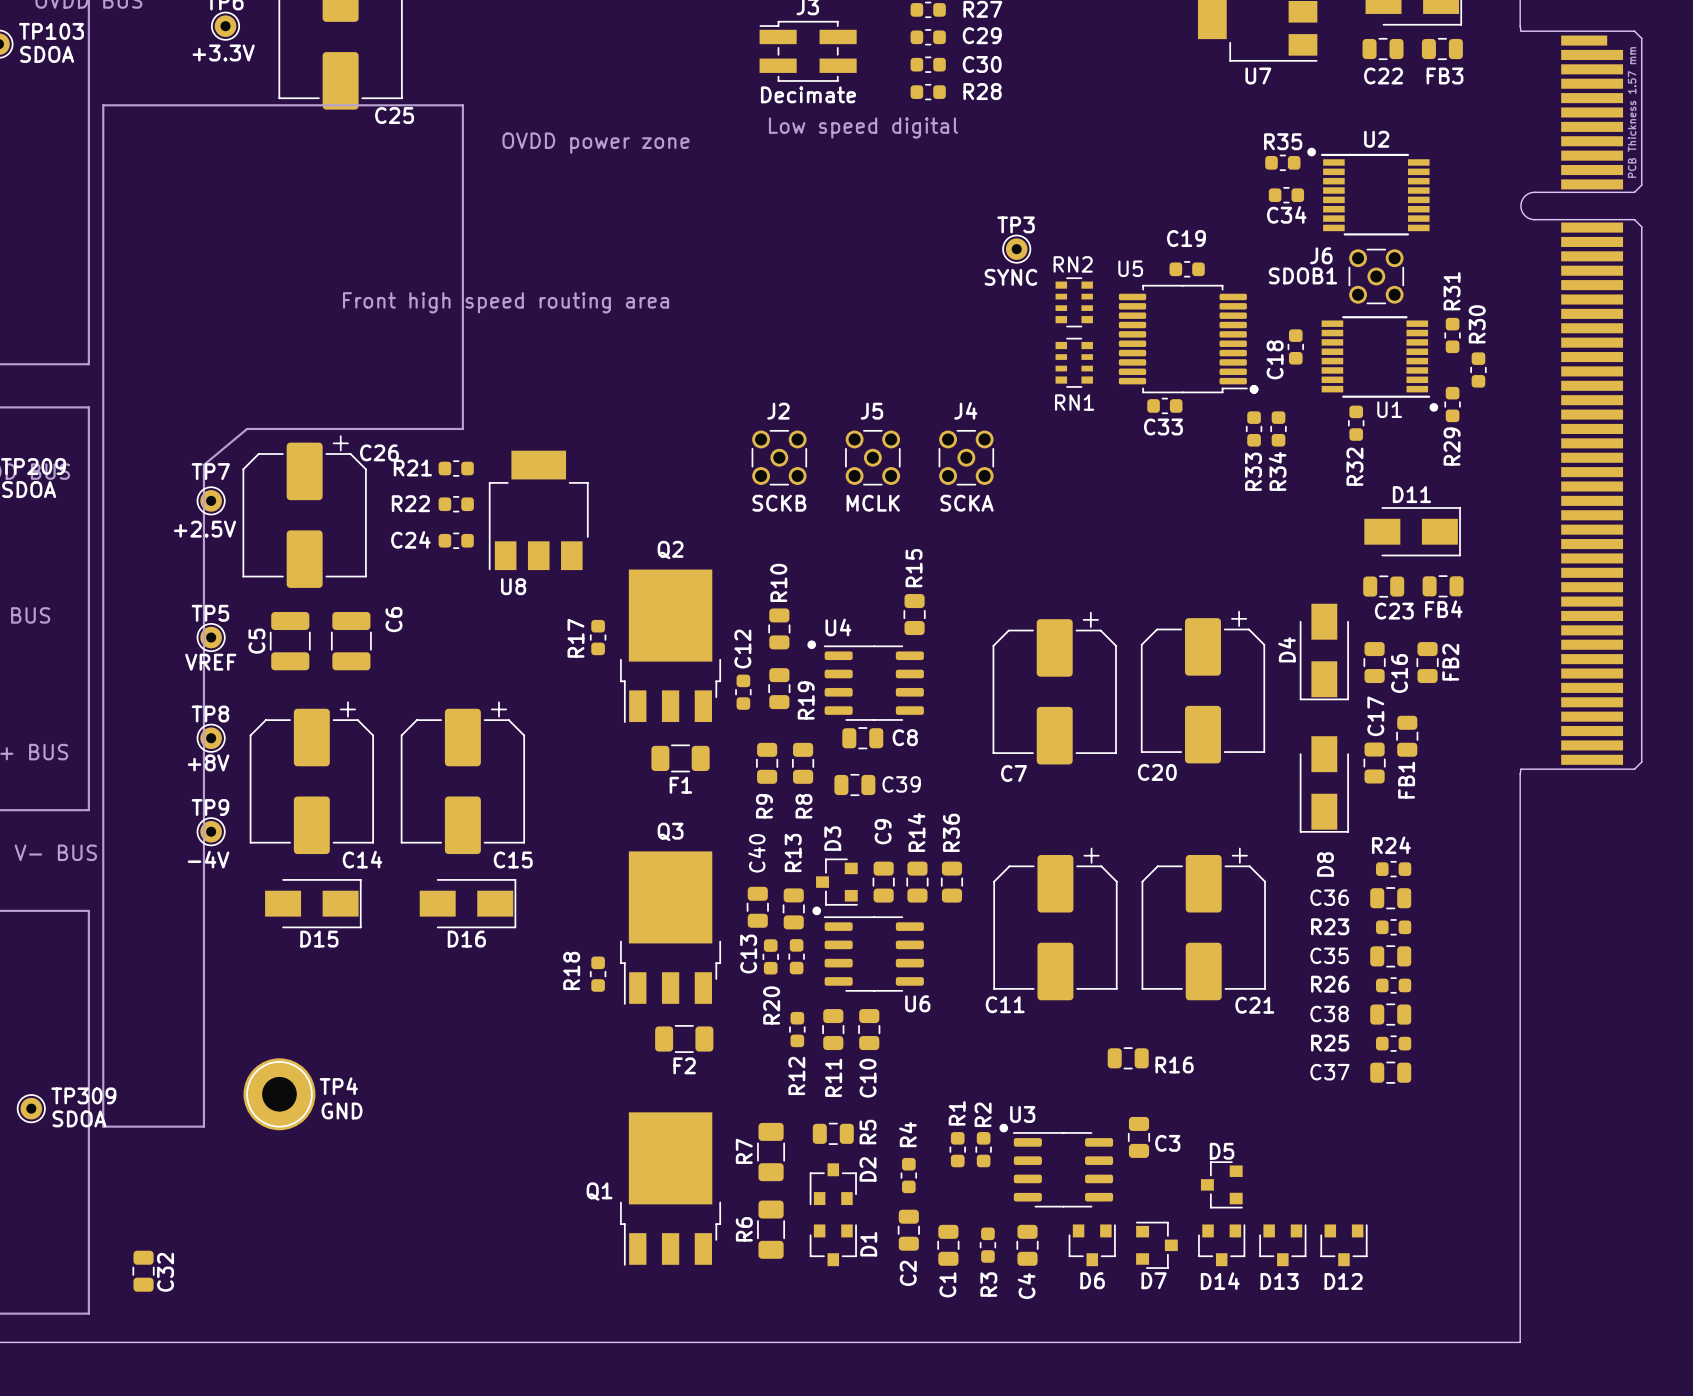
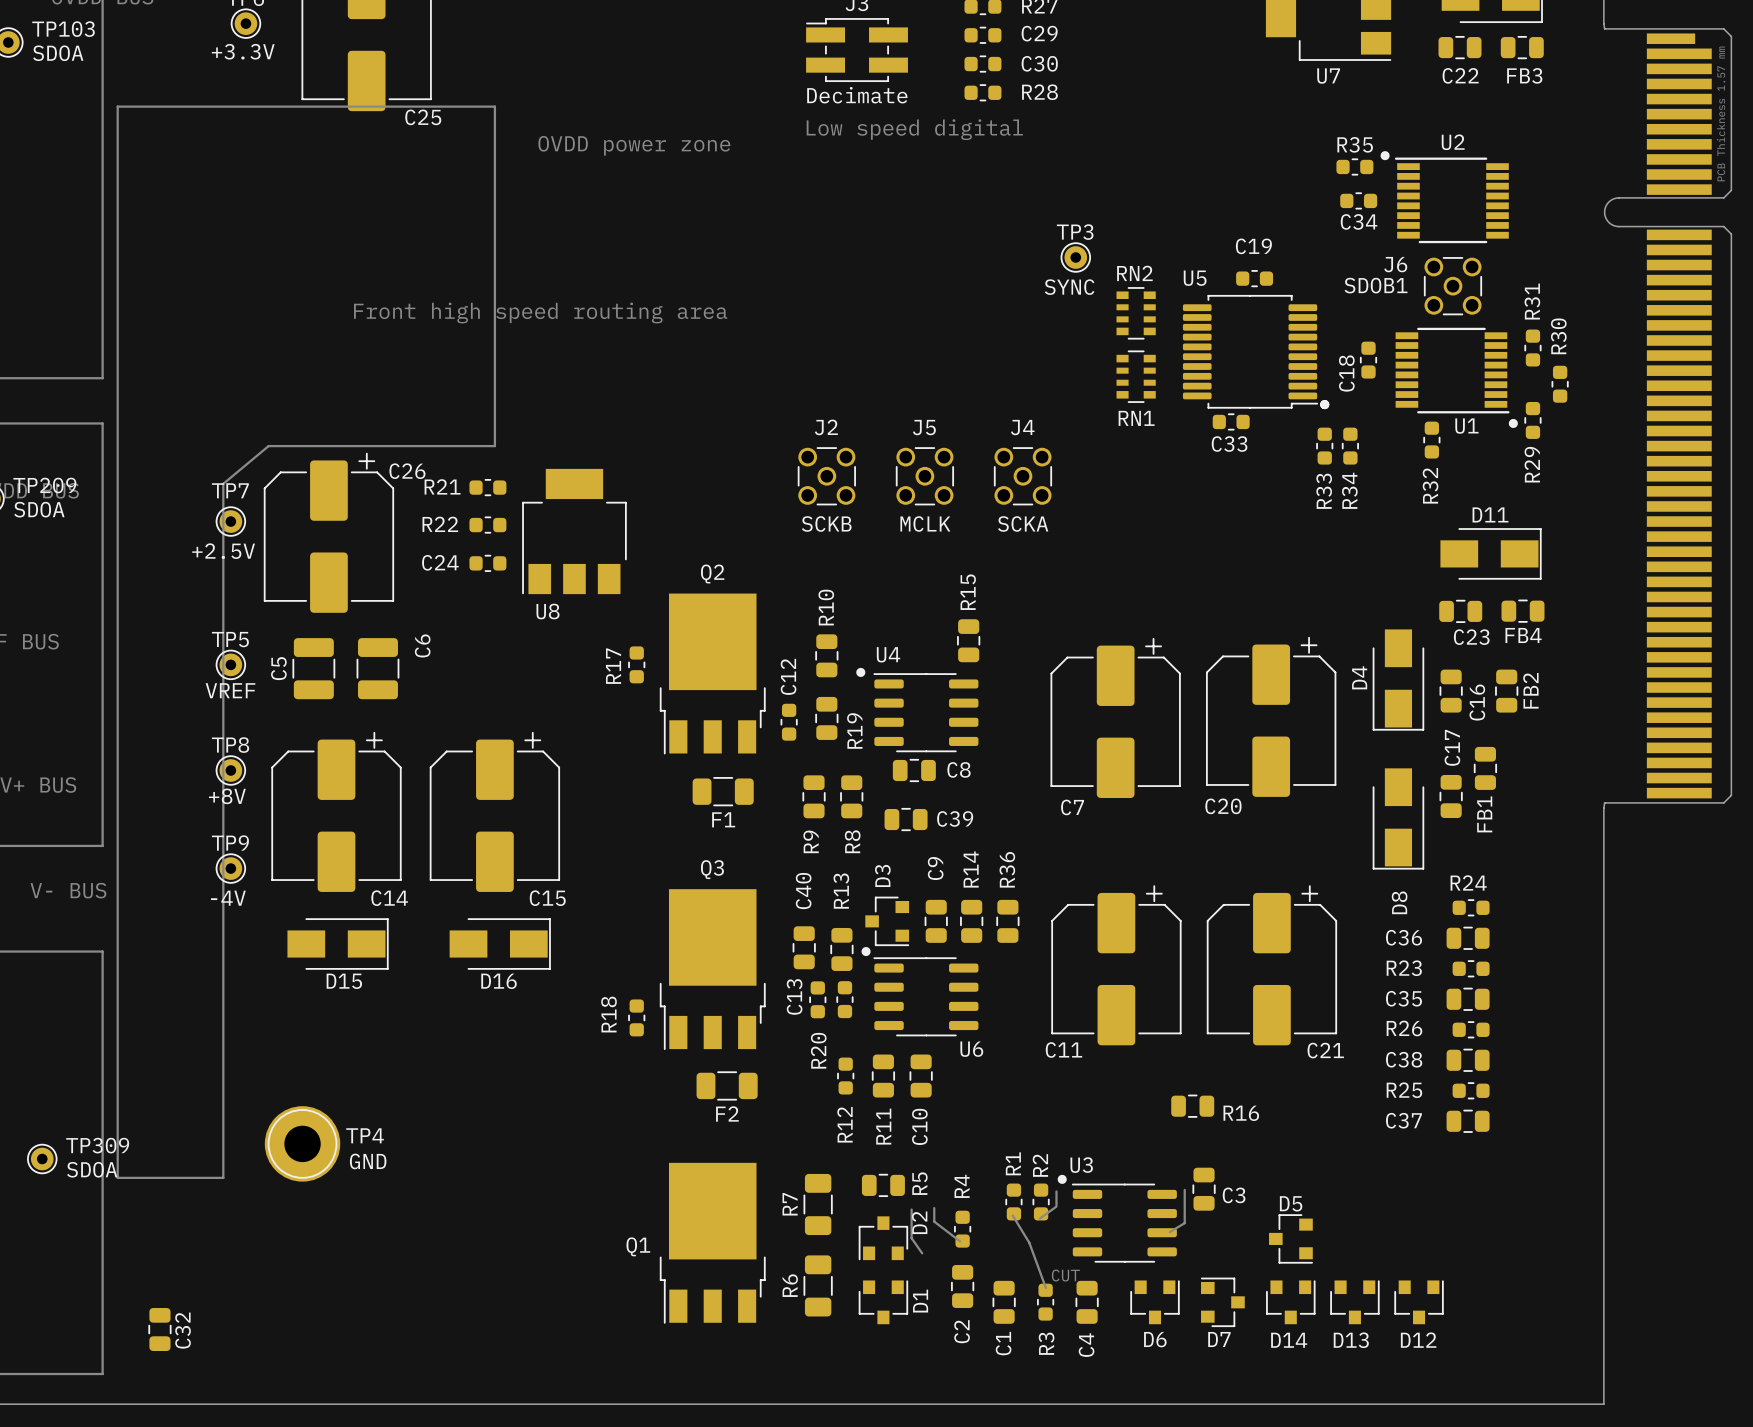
line: none -> (1184, 1189) (1184, 1223) (1169, 1232)
line: none -> (1056, 1191) (1056, 1205)
line: none -> (1056, 1206) (1039, 1218)
line: none -> (934, 1208) (934, 1221) (959, 1241)
line: none -> (911, 1209) (911, 1238) (922, 1253)
line: none -> (1012, 1215) (1029, 1242) (1045, 1288)
text: none -> CUT (1065, 1275)

